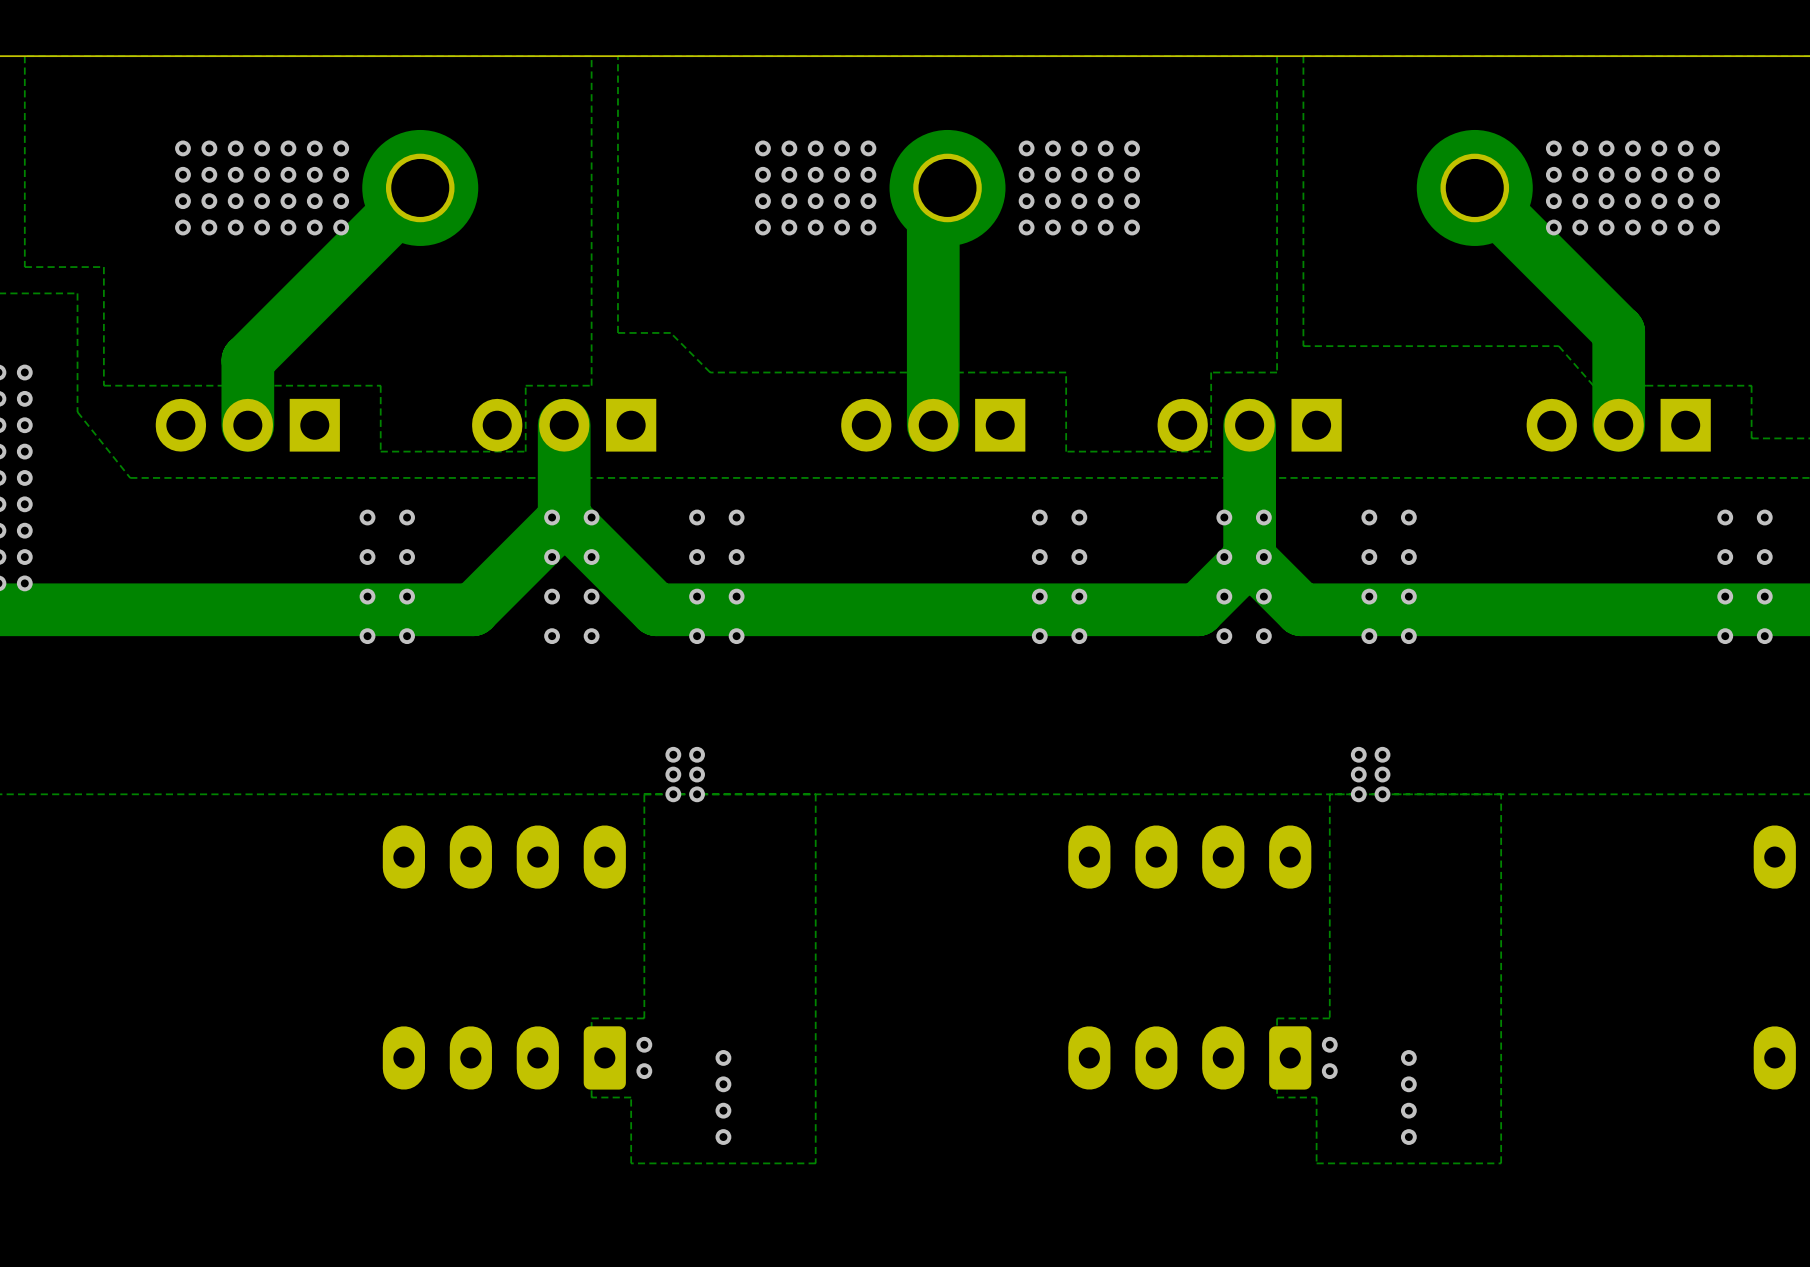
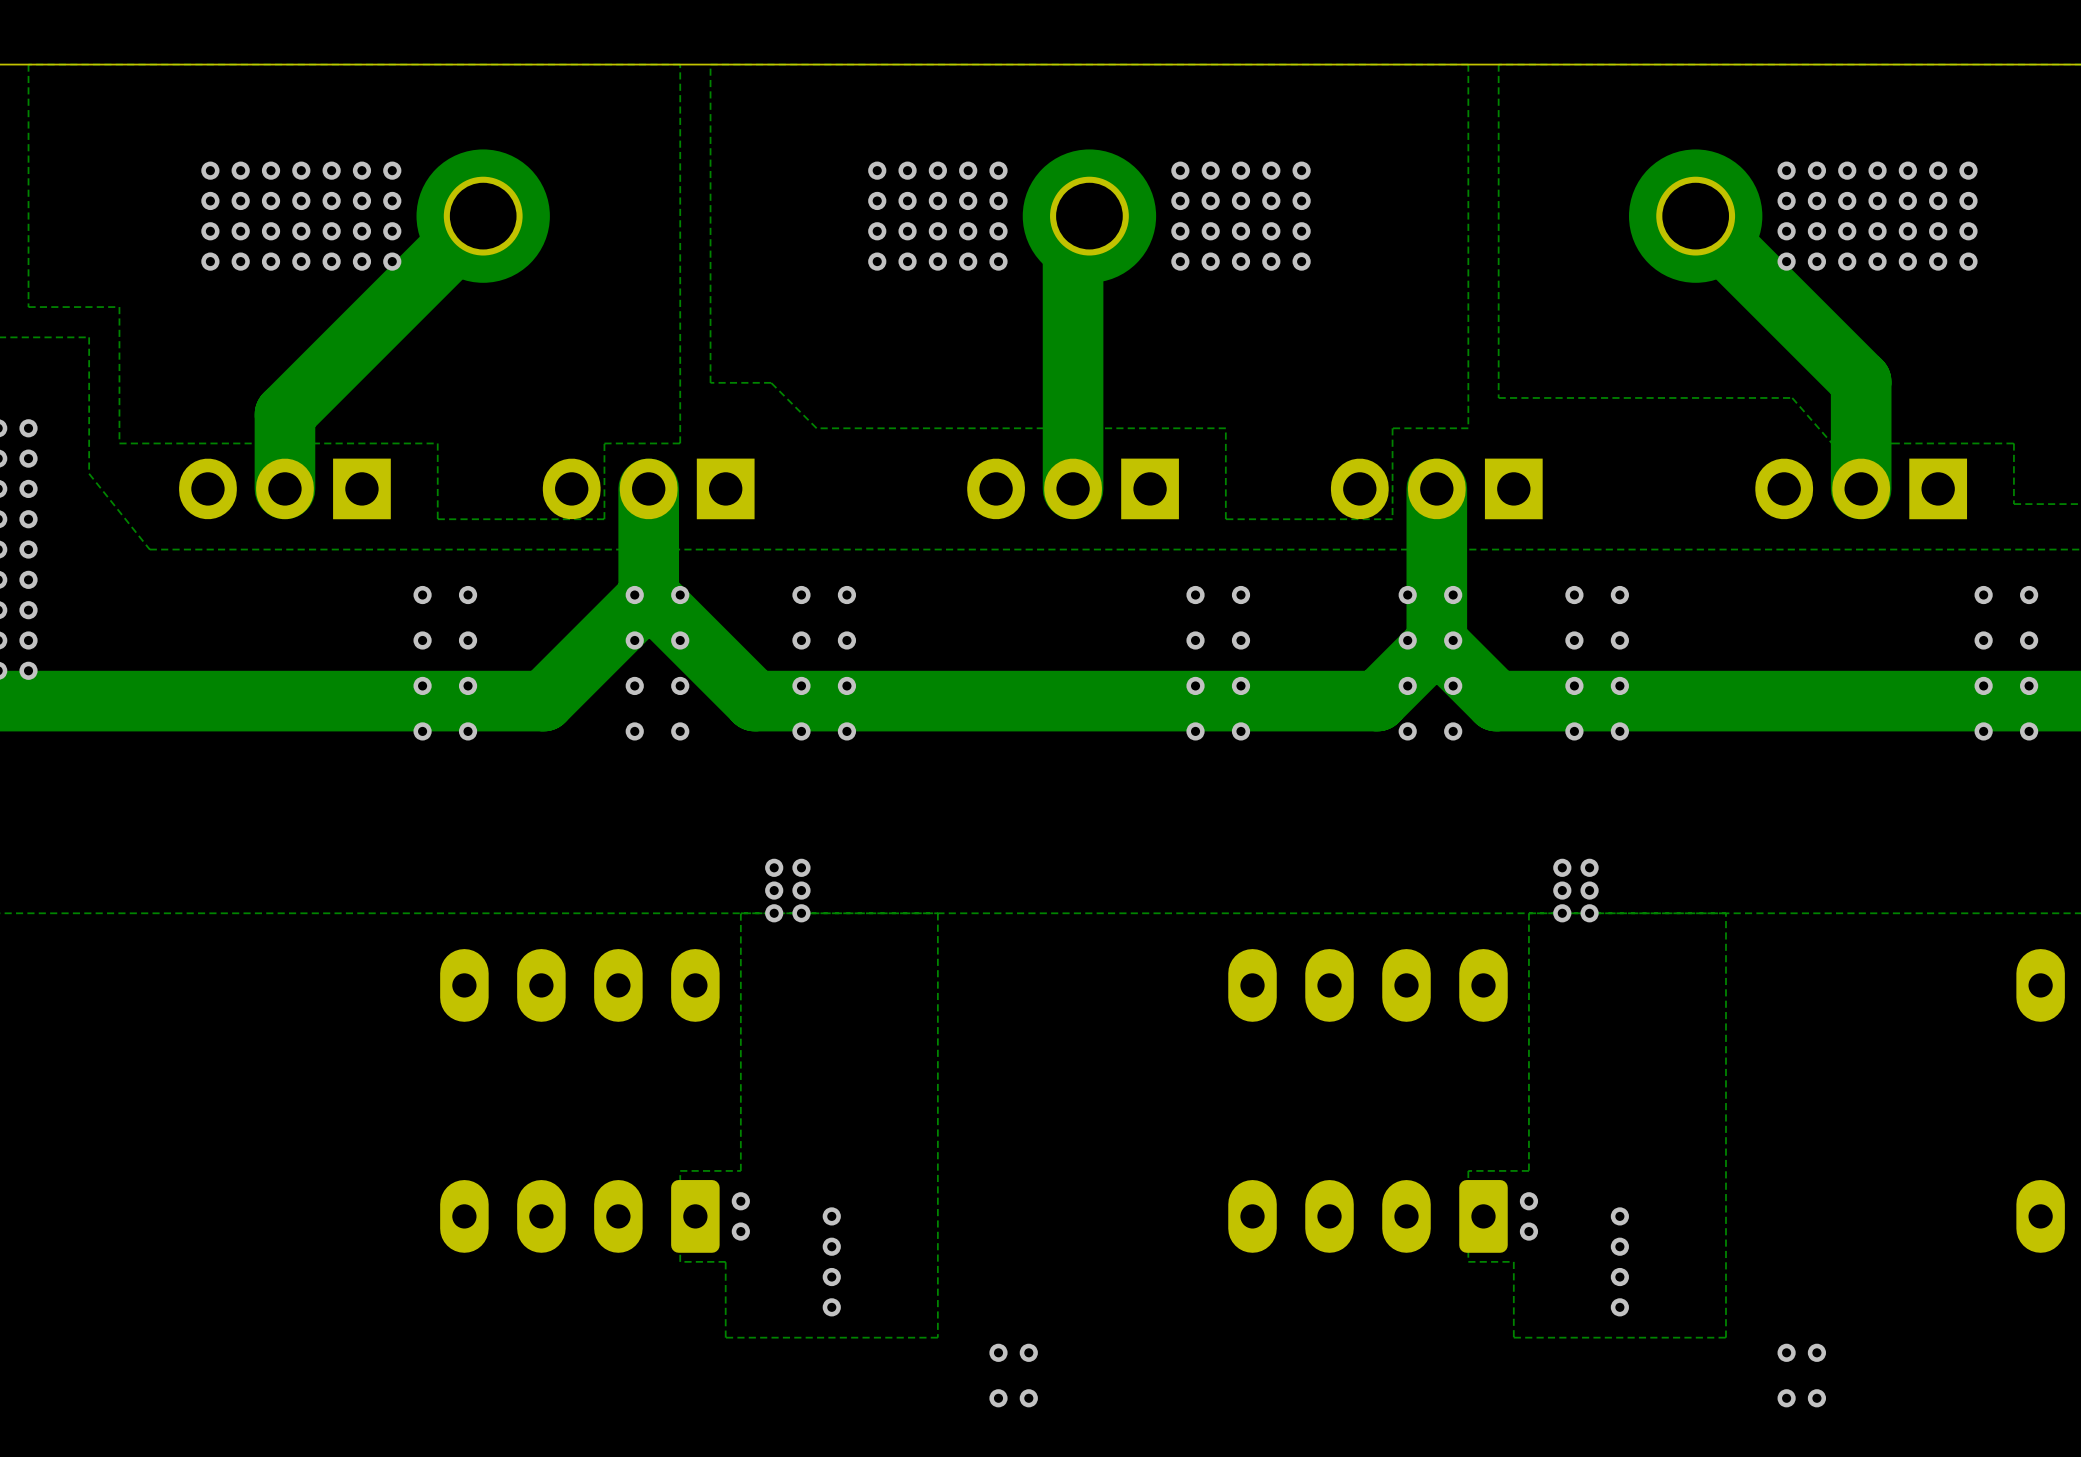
via: none -> (998, 1352)
via: none -> (1028, 1352)
via: none -> (1786, 1352)
via: none -> (1816, 1352)
via: none -> (998, 1398)
via: none -> (1028, 1398)
via: none -> (1786, 1398)
via: none -> (1816, 1398)

